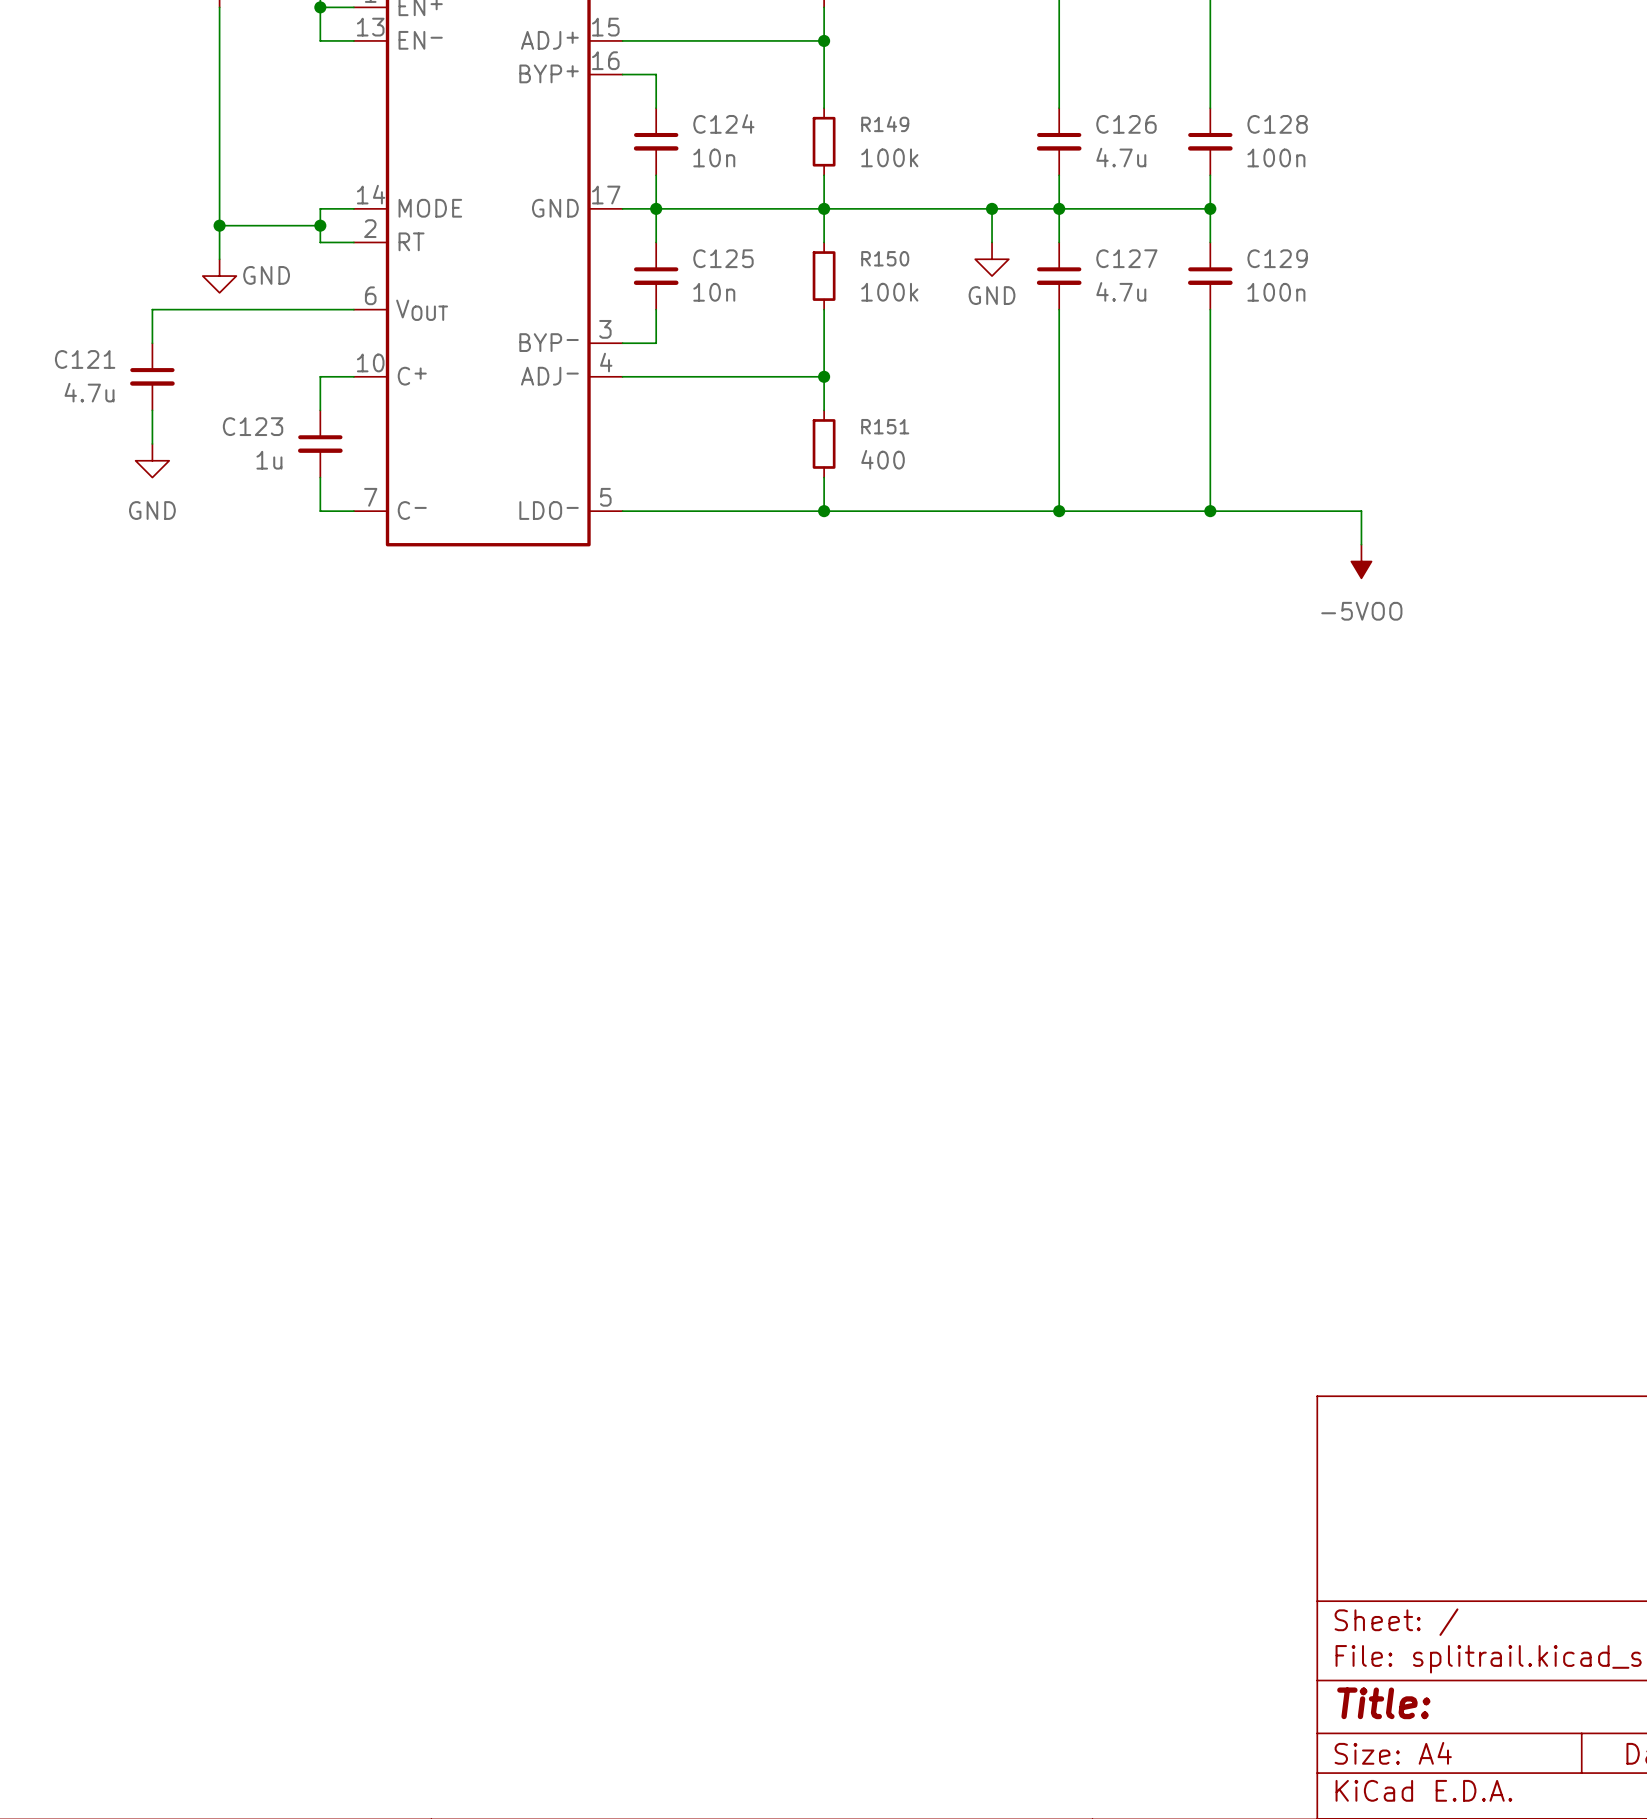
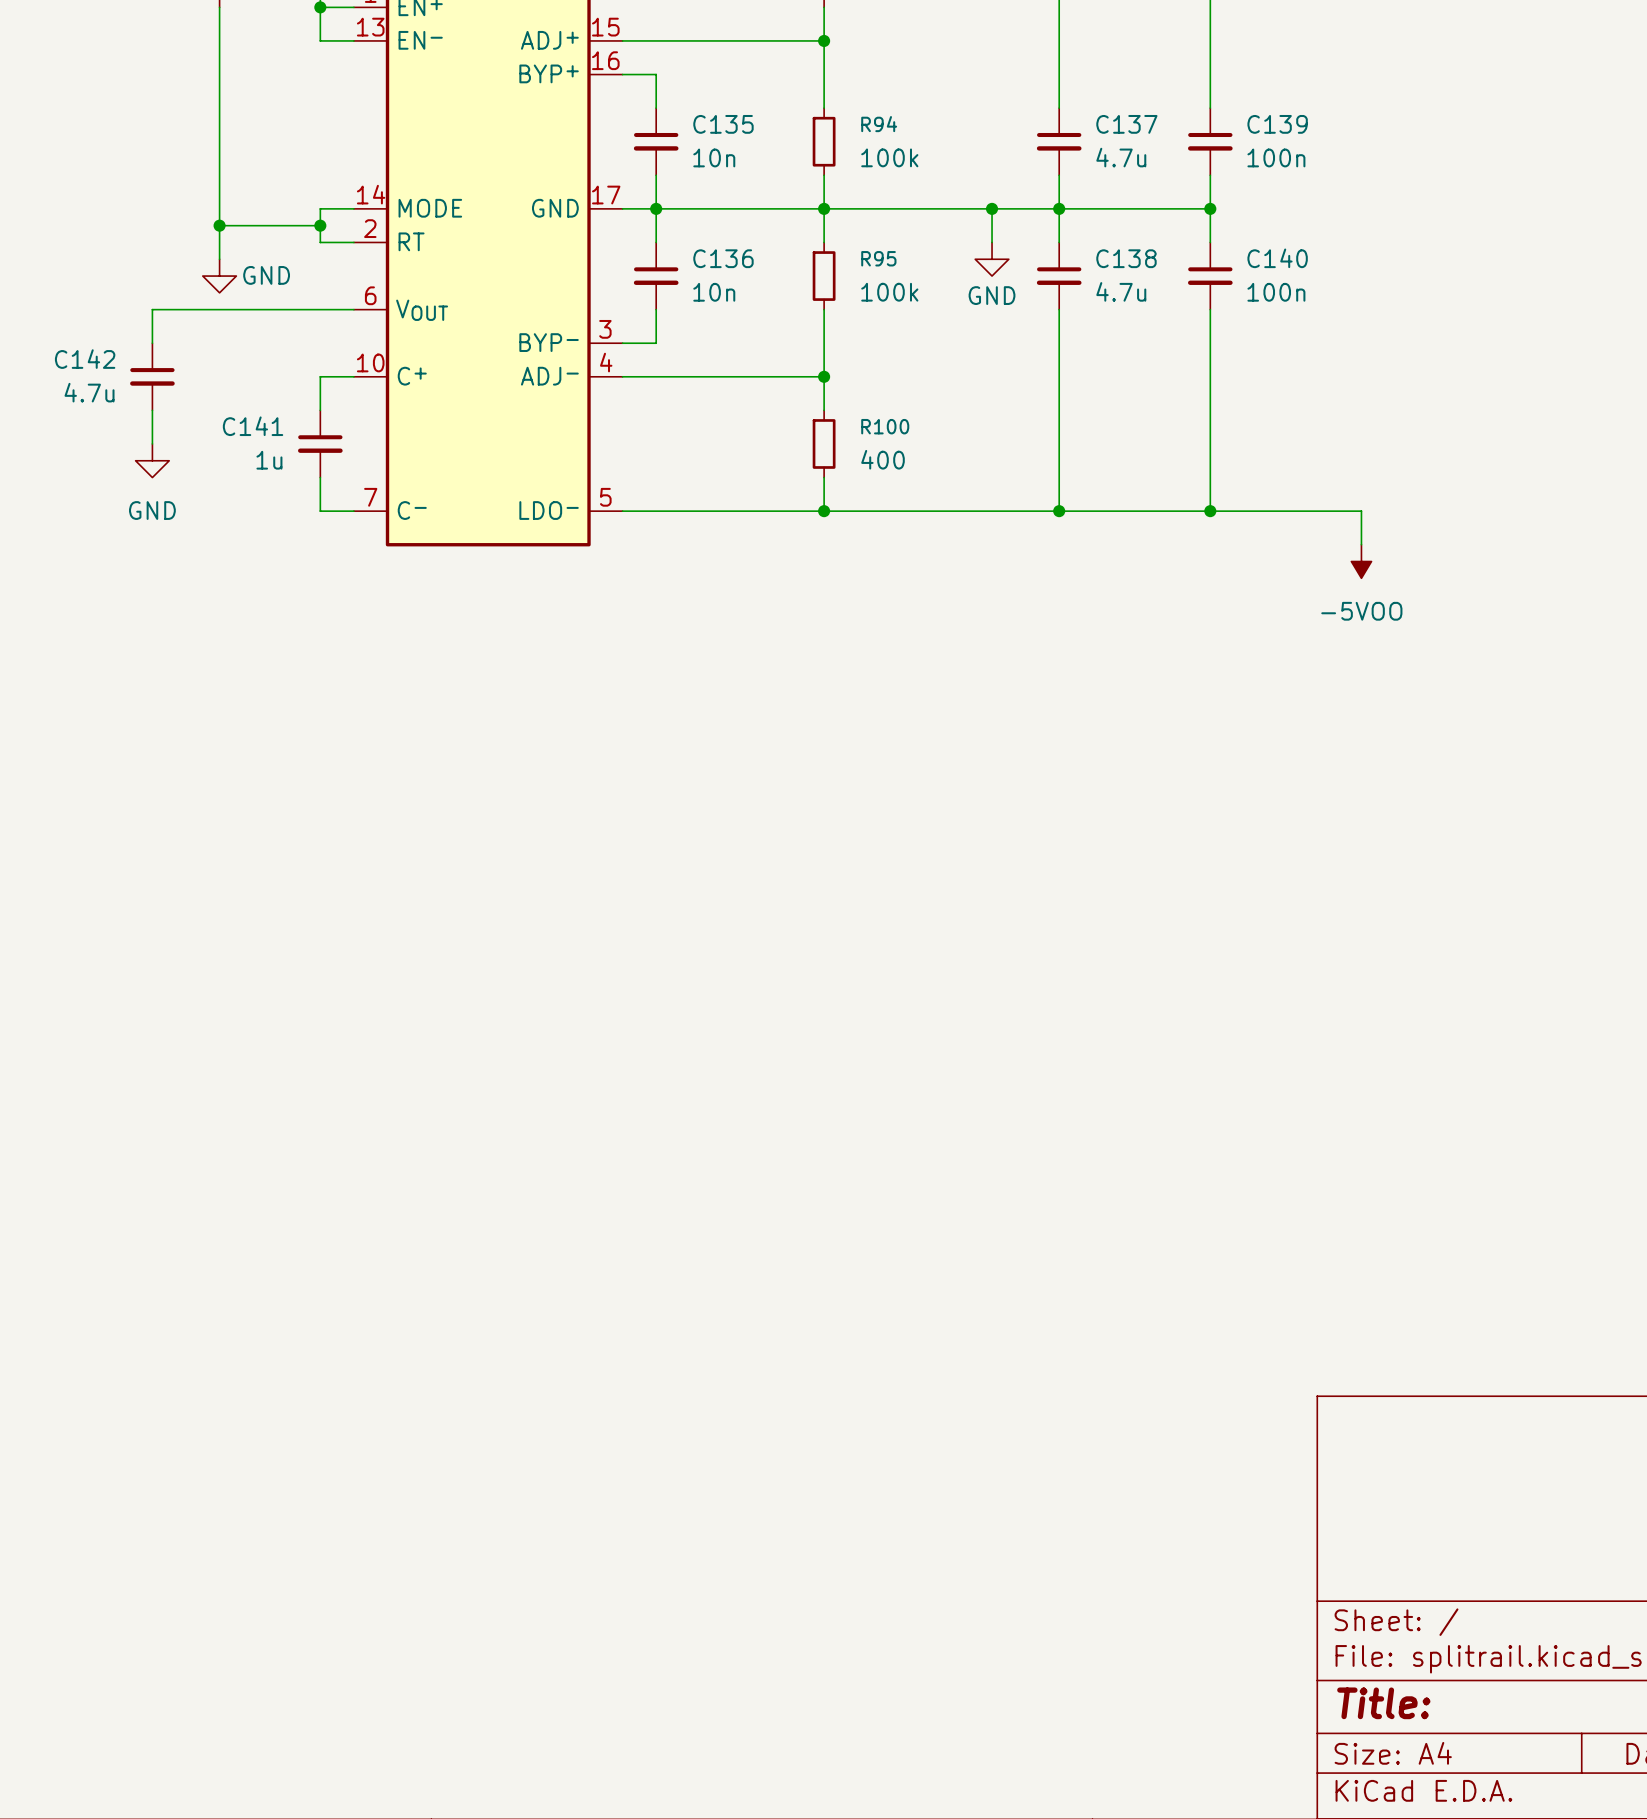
C124 name: C124 (723, 123) -> C135 (723, 124)
R149 name: R149 (885, 124) -> R94 (879, 124)
C126 name: C126 (1126, 124) -> C137 (1126, 124)
C128 name: C128 (1277, 124) -> C139 (1277, 124)
C125 name: C125 (723, 258) -> C136 (723, 258)
R150 name: R150 (885, 258) -> R95 (878, 258)
C127 name: C127 (1126, 258) -> C138 (1126, 258)
C129 name: C129 (1277, 258) -> C140 (1277, 258)
C121 name: C121 (85, 359) -> C142 (85, 359)
C123 name: C123 (253, 426) -> C141 (253, 426)
R151 name: R151 (885, 426) -> R100 (885, 426)

